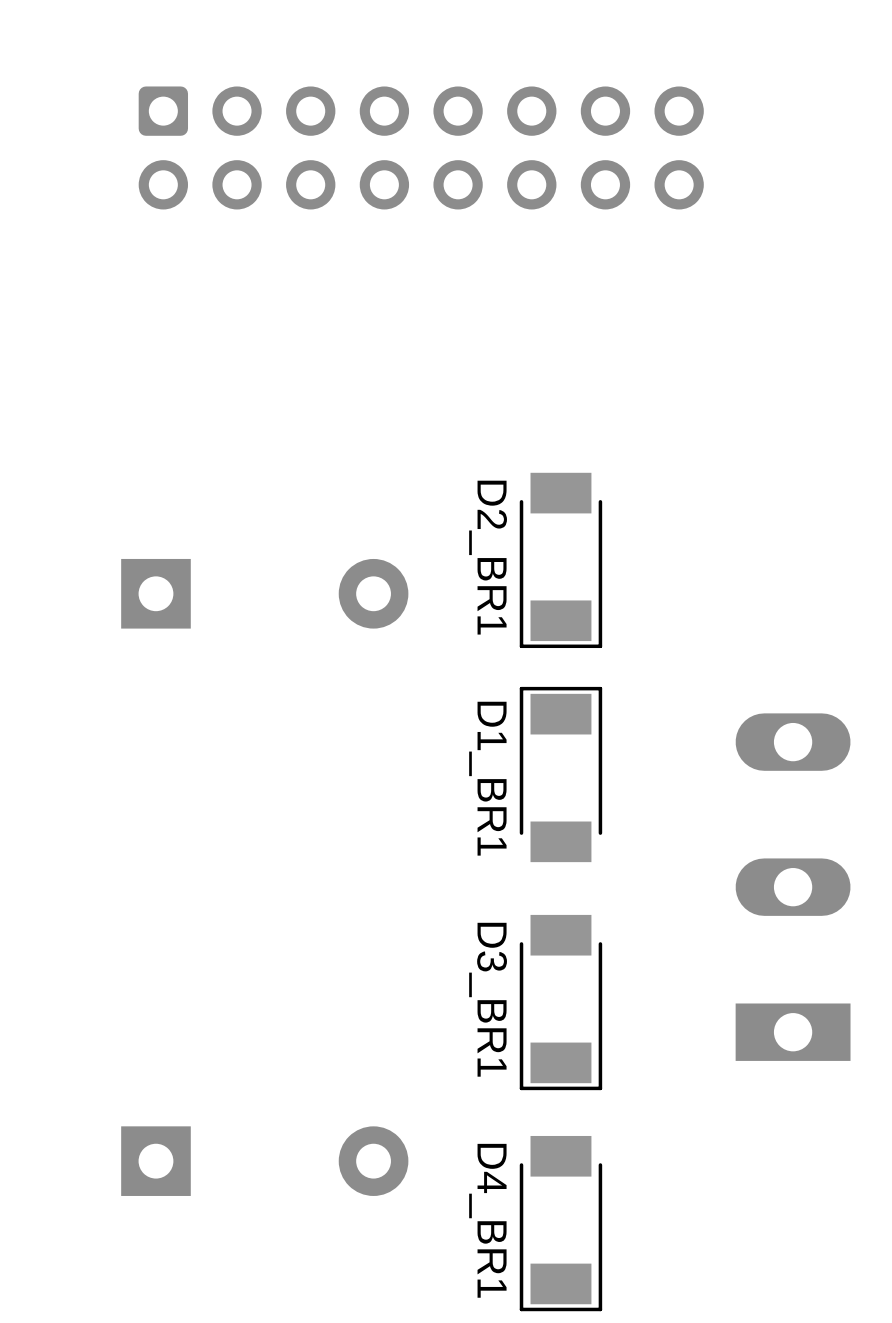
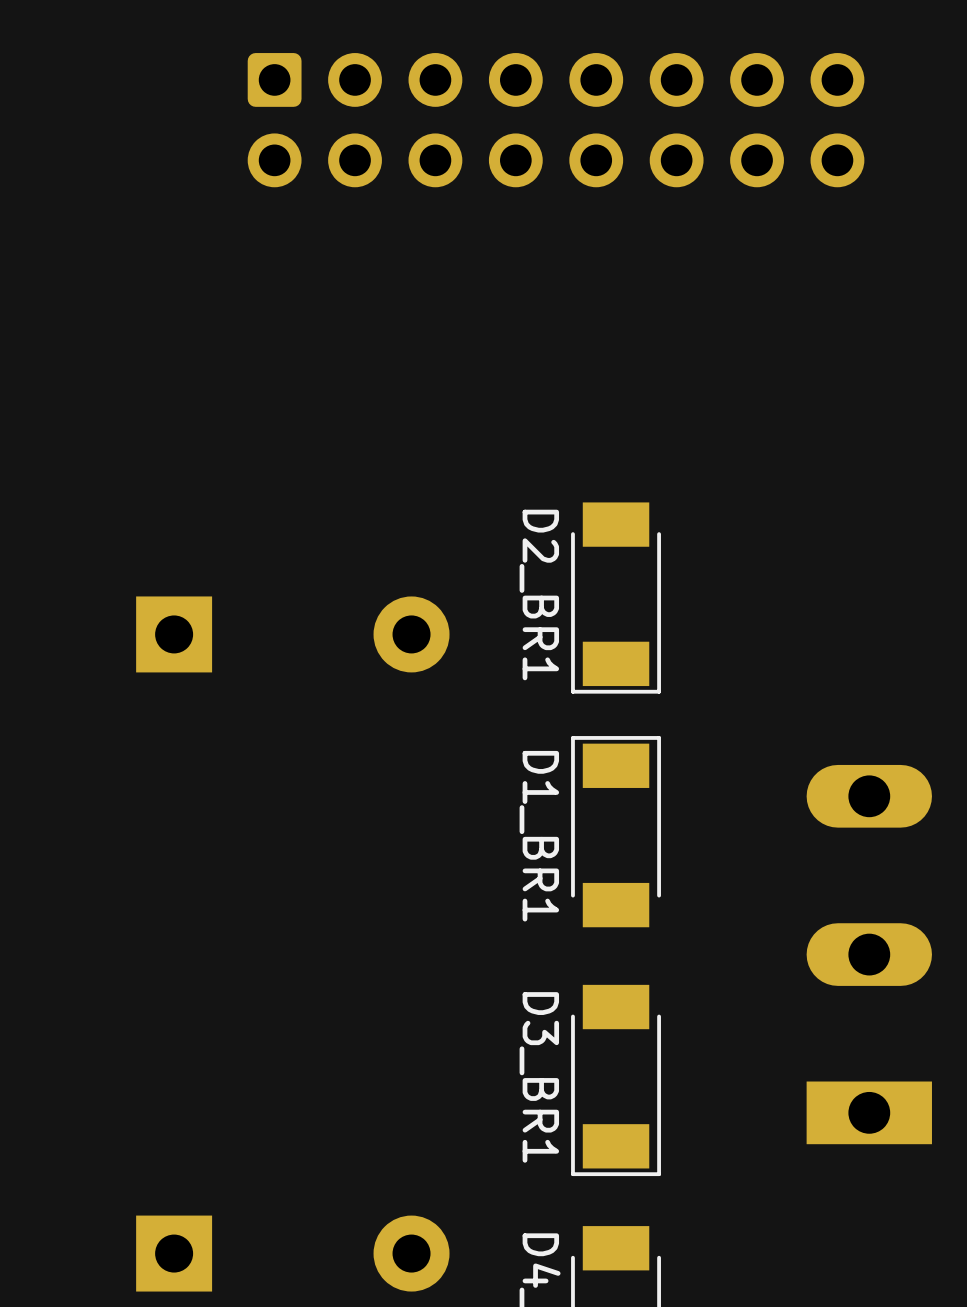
part position: (421, 147) -> (556, 120)

